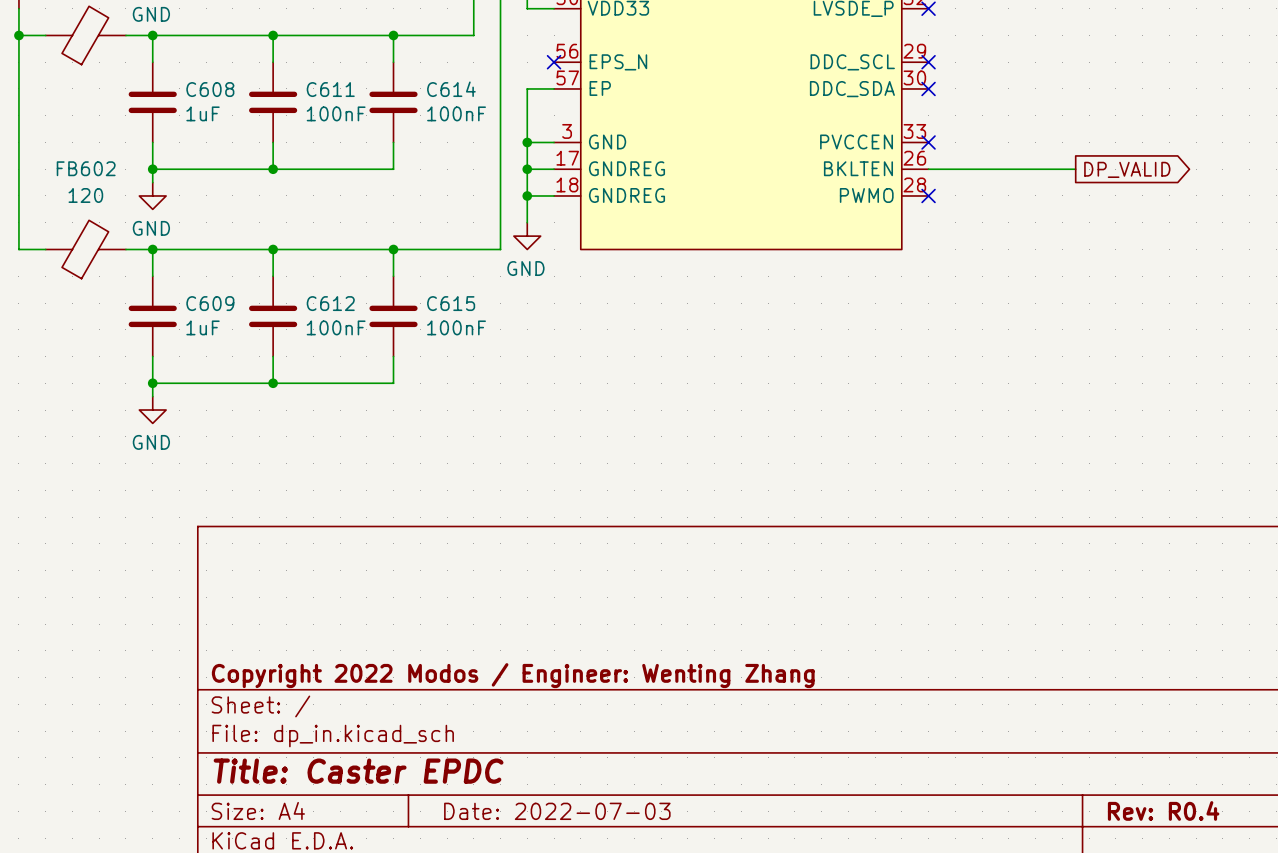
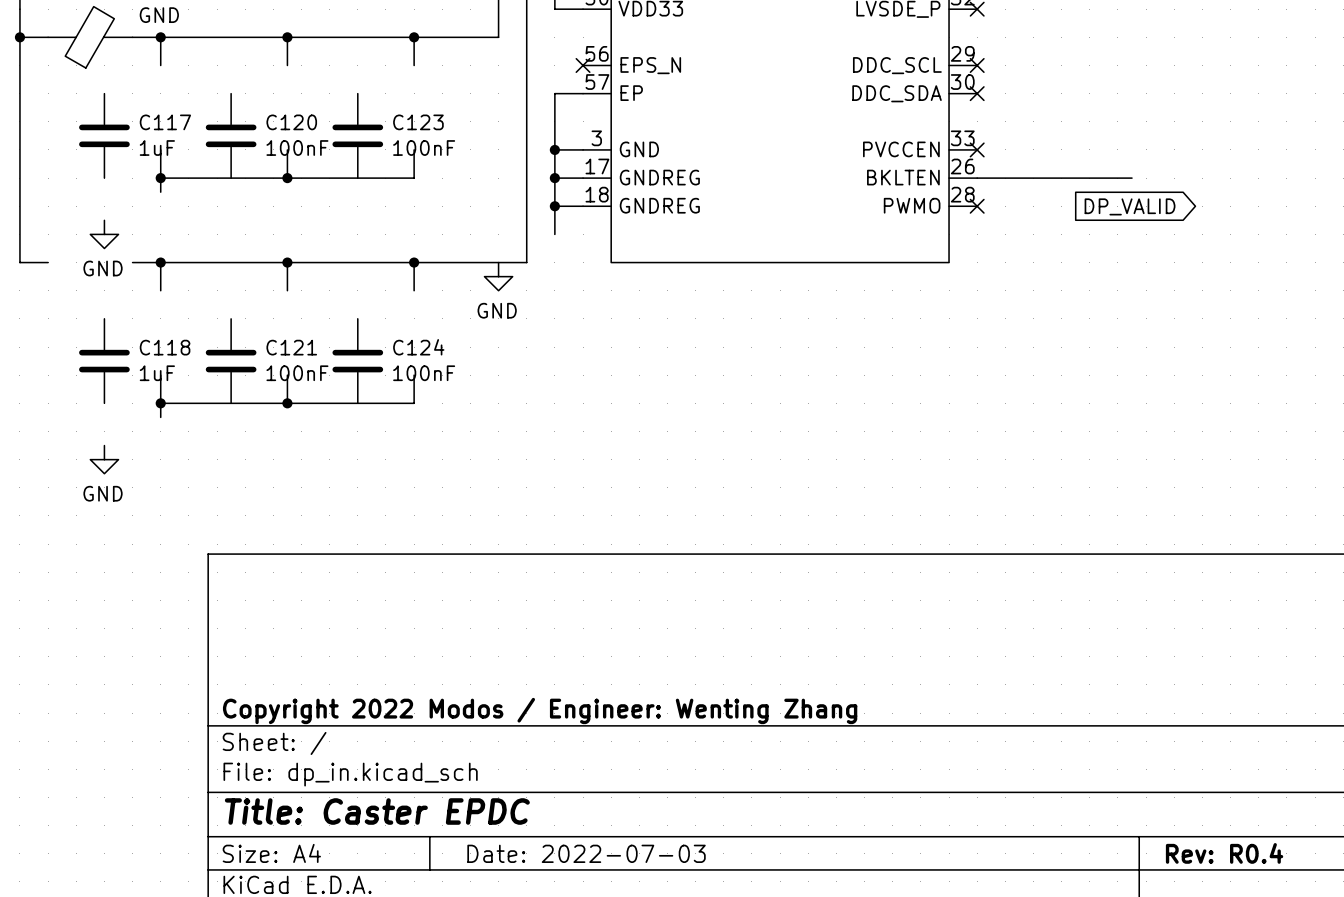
C608: 1uF (152, 102) -> none
C611: 100nF (273, 102) -> none
C614: 100nF (393, 102) -> none
C117: none -> 1uF (104, 135)
C120: none -> 100nF (231, 135)
C123: none -> 100nF (357, 135)
global label position: DP_VALID (1127, 169) -> DP_VALID (1130, 206)
power symbol position: GND (152, 195) -> GND (104, 234)
power symbol position: GND (527, 236) -> GND (498, 276)
FB602: 120 (85, 249) -> none
C609: 1uF (152, 316) -> none
C612: 100nF (273, 316) -> none
C615: 100nF (393, 316) -> none
C118: none -> 1uF (104, 361)
C121: none -> 100nF (231, 361)
C124: none -> 100nF (357, 361)
power symbol position: GND (152, 410) -> GND (104, 459)

